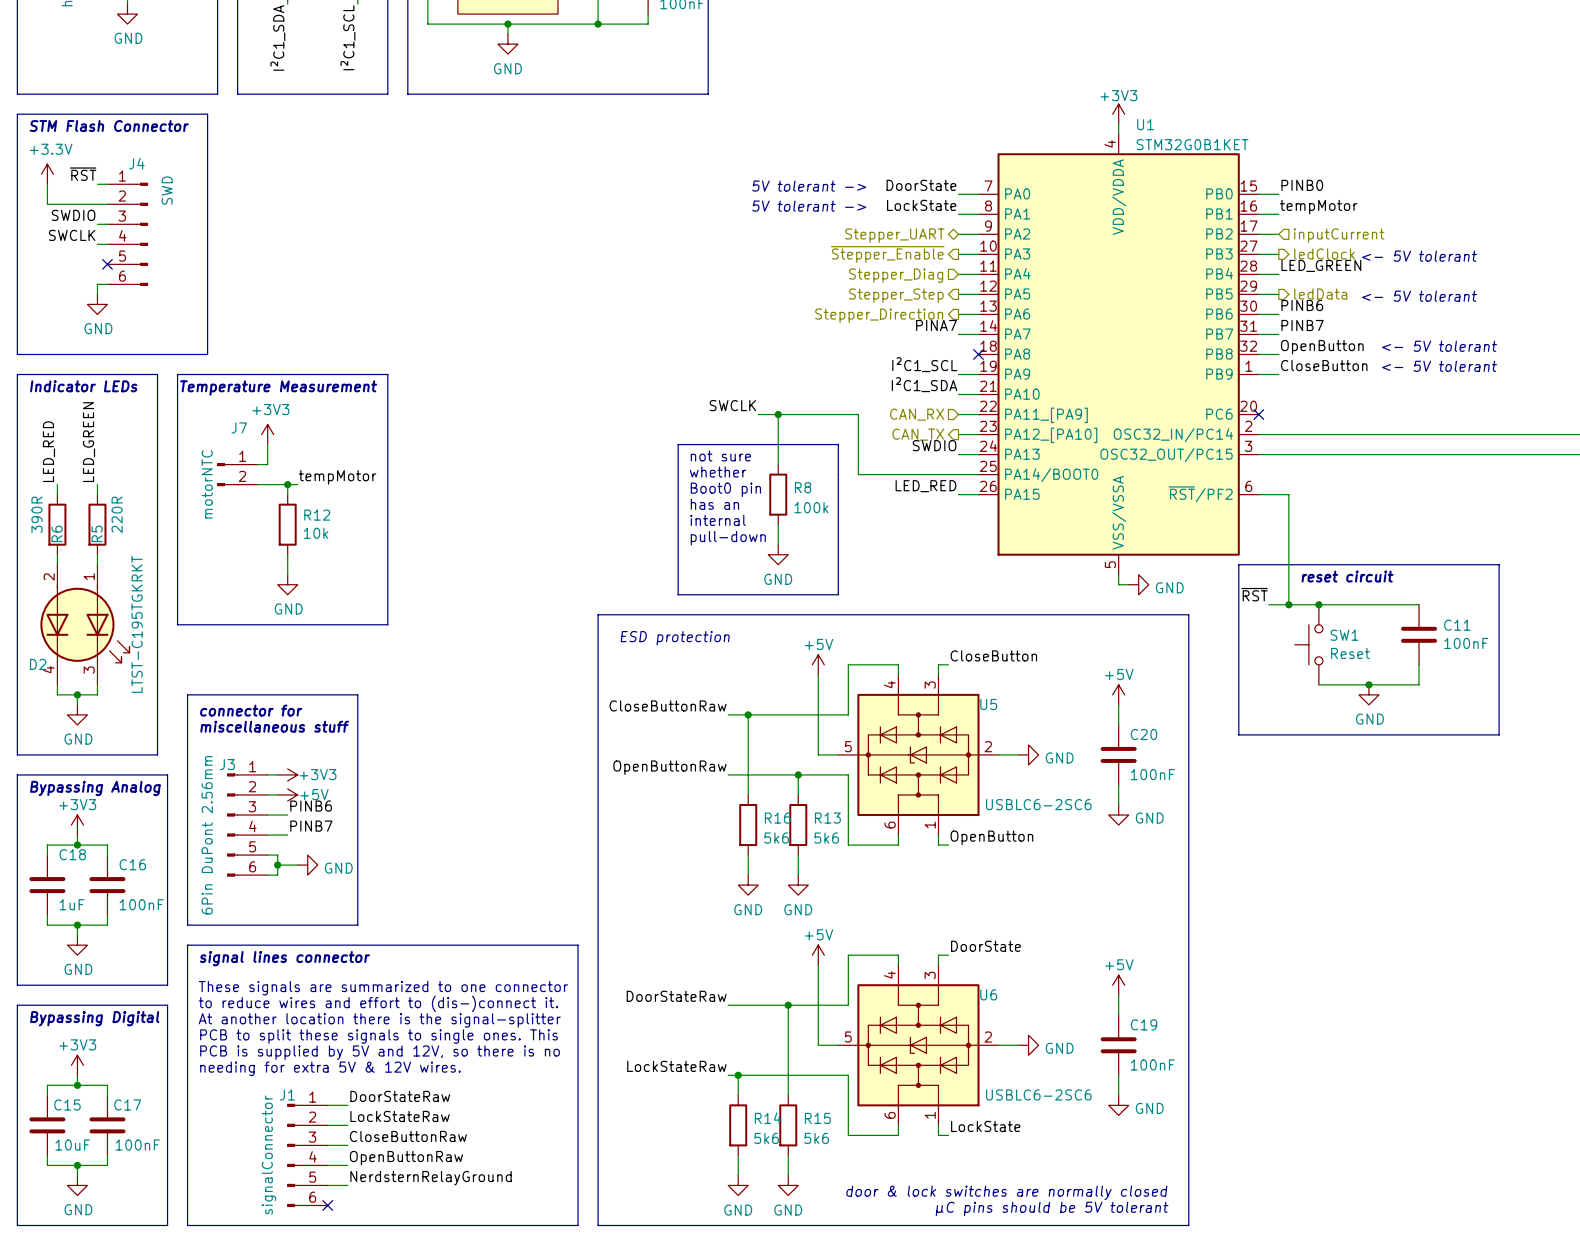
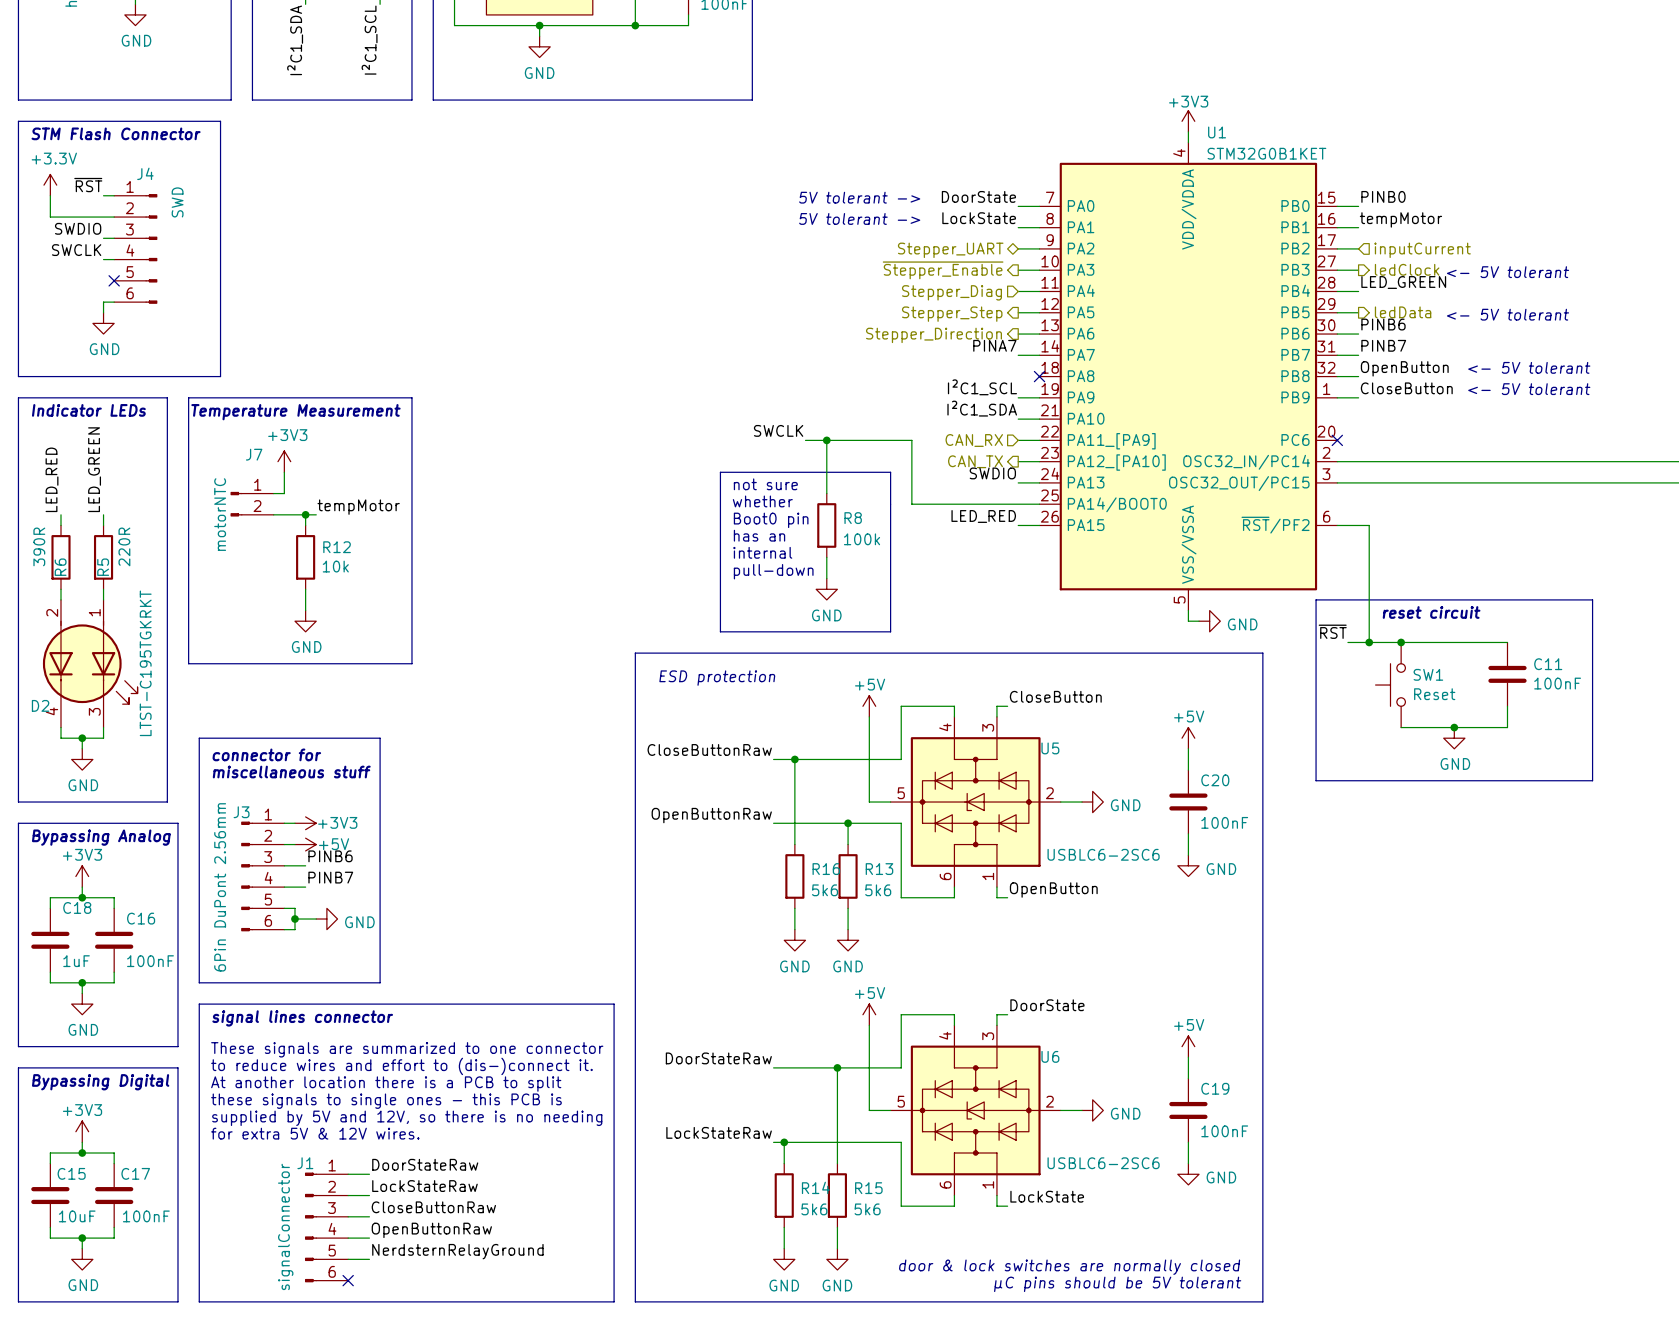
text: At another location there is the signal-splitter (379, 1020) -> At another location there is a PCB to split (386, 1084)
text: PCB to split these signals to single ones. This (379, 1036) -> these signals to single ones - this PCB is (386, 1101)
text: PCB is supplied by 5V and 12V, so there is no (380, 1052) -> supplied by 5V and 12V, so there is no needing (407, 1118)
text: needing for extra 5V & 12V wires. (330, 1068) -> for extra 5V & 12V wires. (315, 1133)

